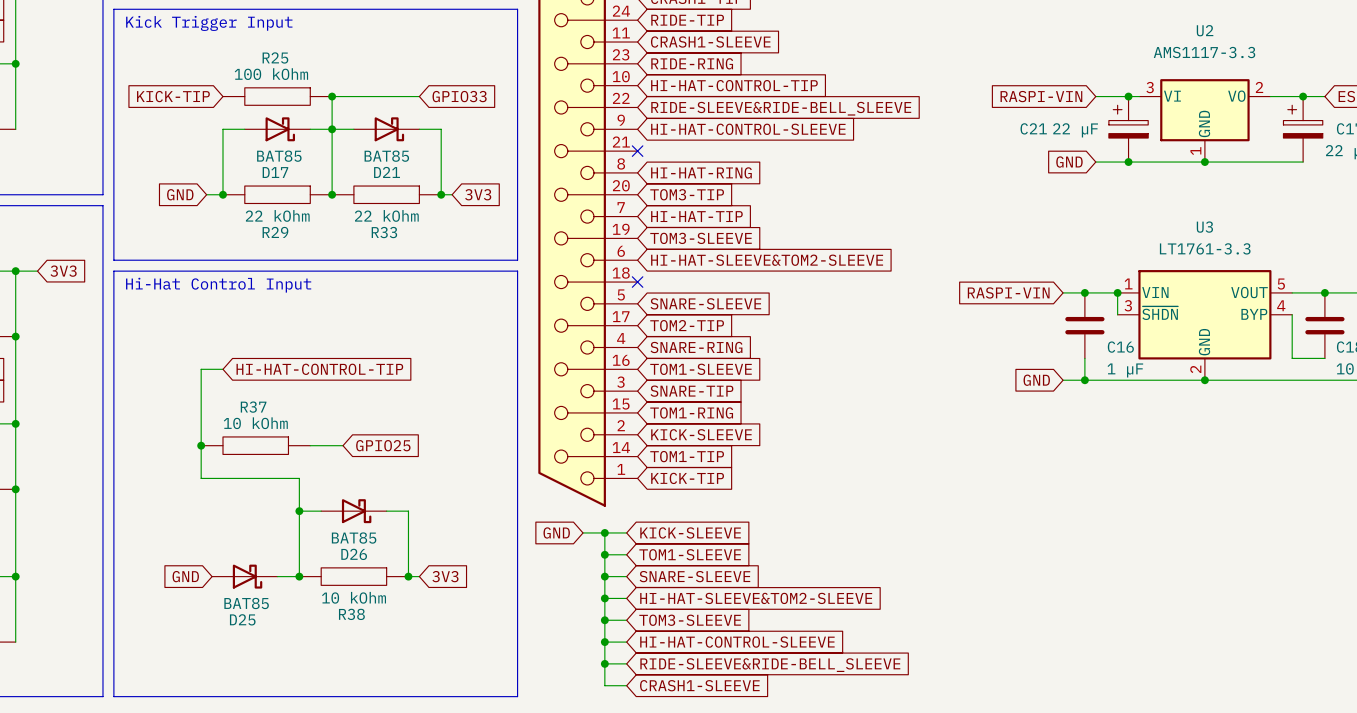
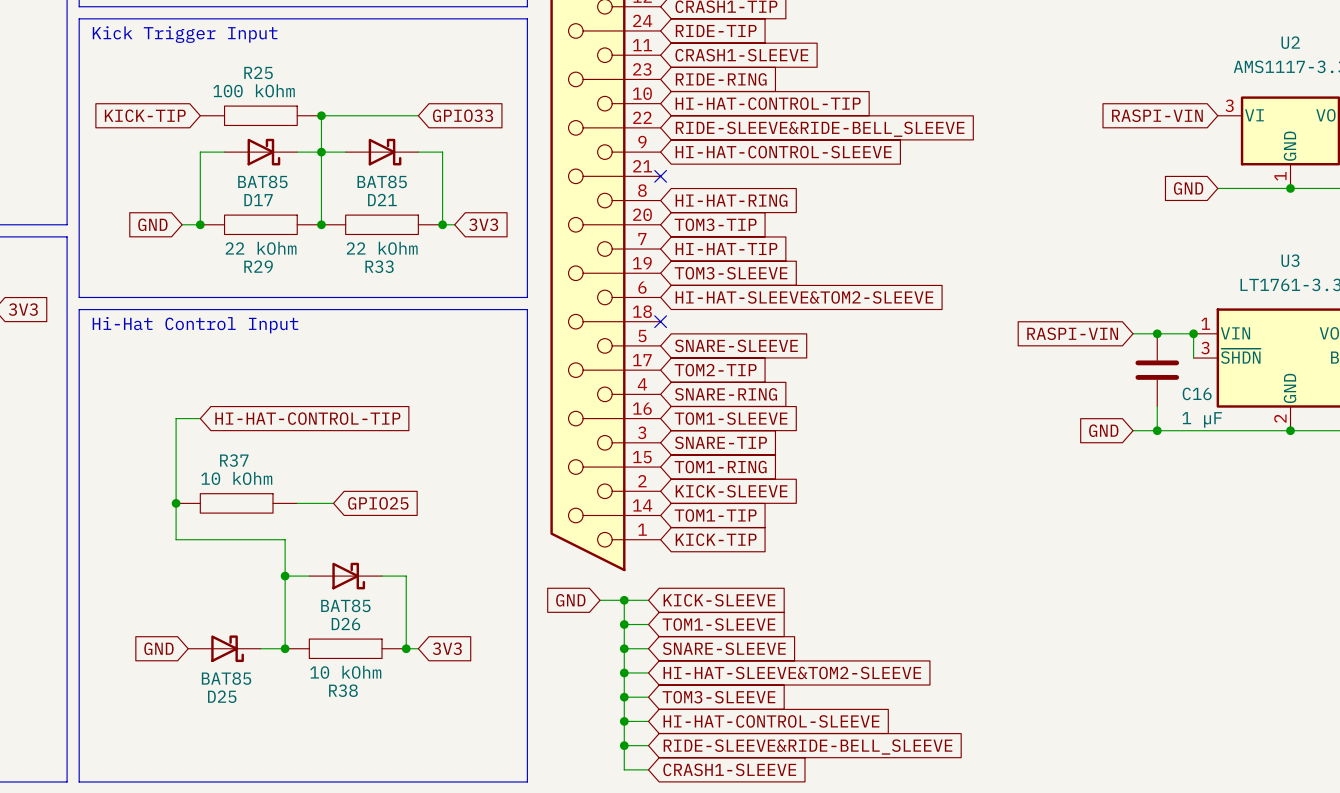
global label position: RASPI-VIN (1041, 96) -> RASPI-VIN (1157, 115)
wire: (1095, 96) (1139, 96) -> none
junction: (1128, 96) -> none
C21: 22 µF (1128, 129) -> none
global label position: GND (1069, 162) -> GND (1188, 188)
wire: (1095, 162) (1139, 162) -> none
junction: (1128, 162) -> none

